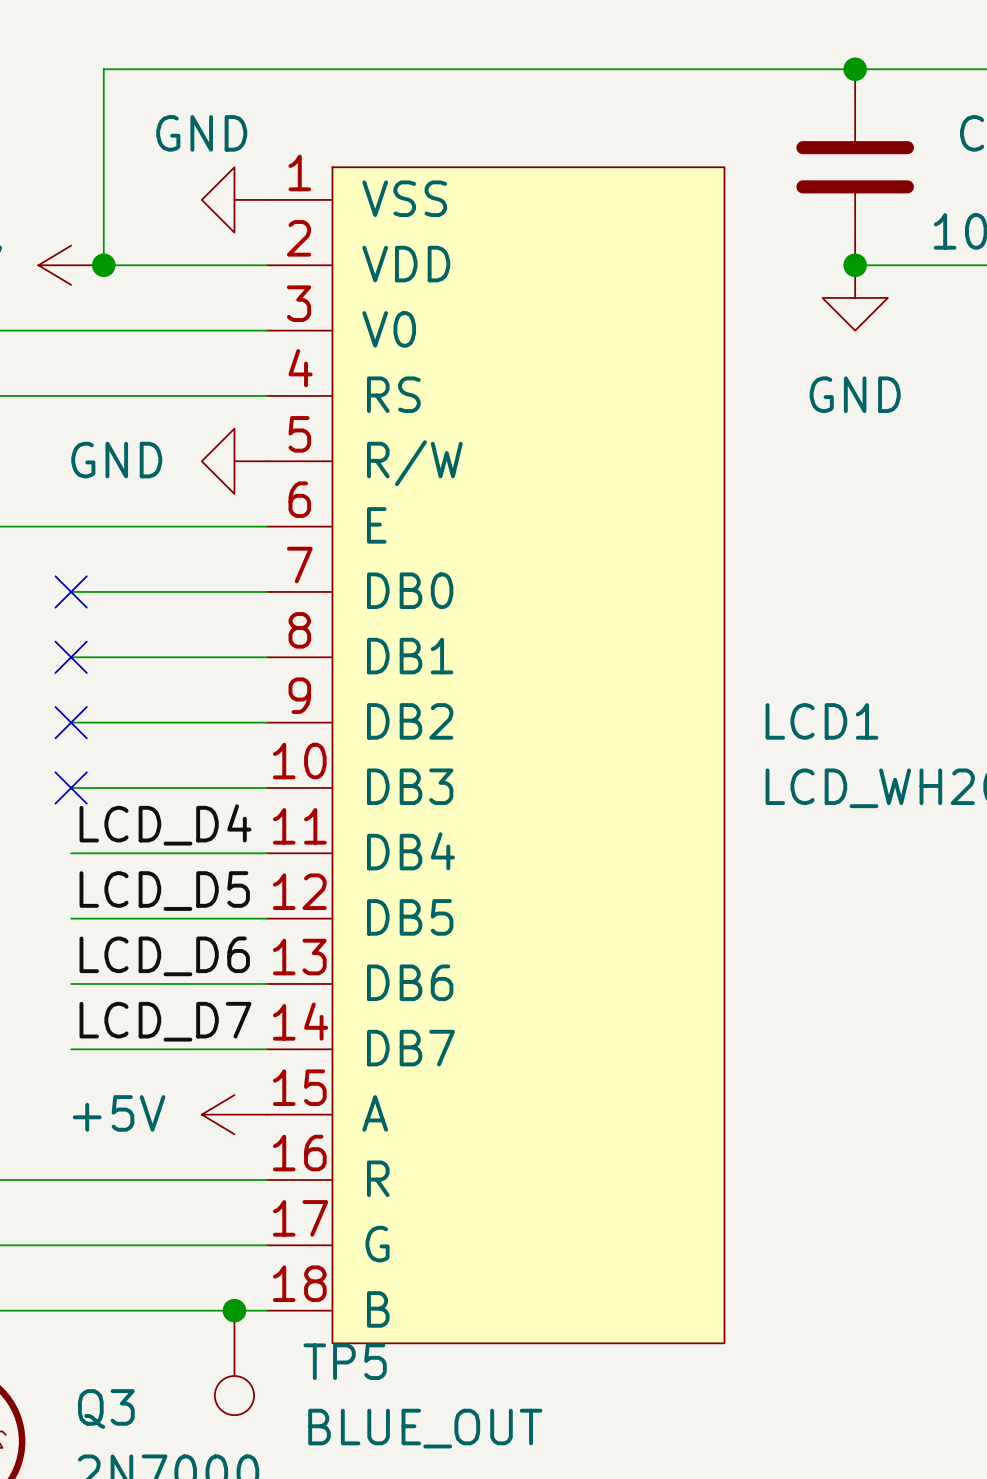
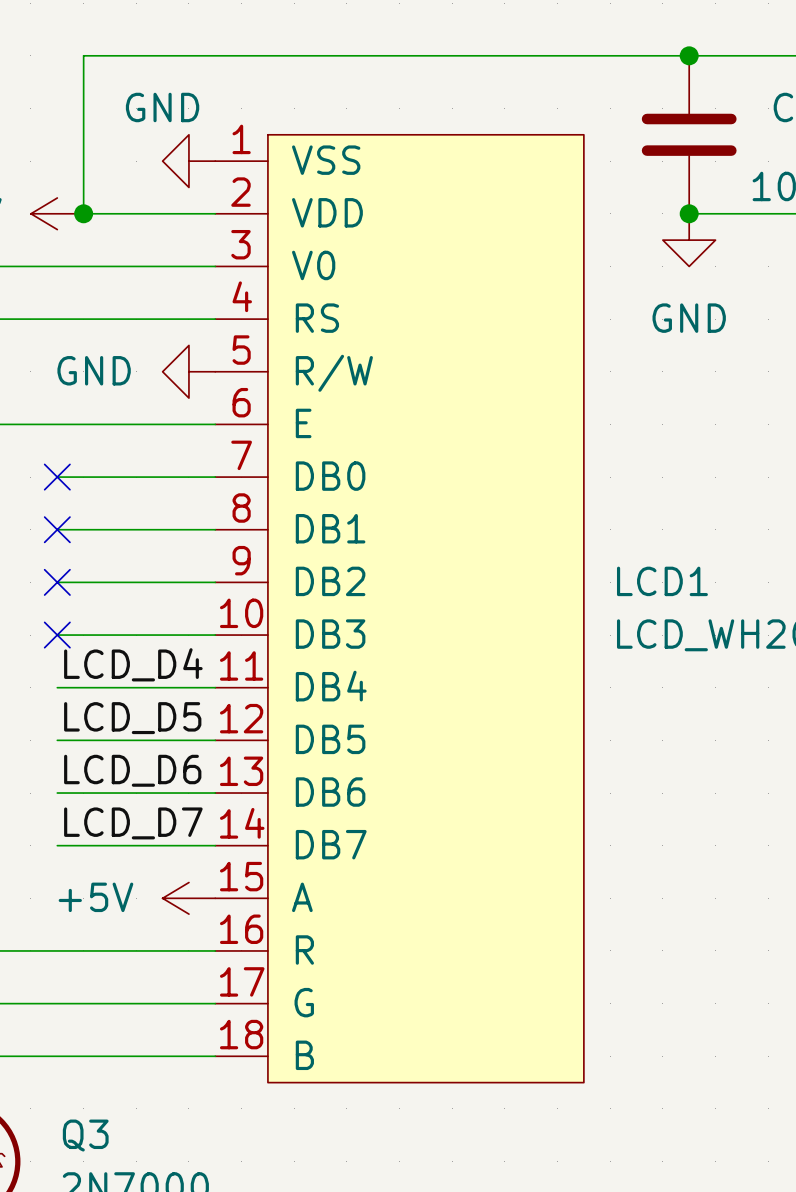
junction: (234, 1310) -> none
TP5: BLUE_OUT (234, 1362) -> none

